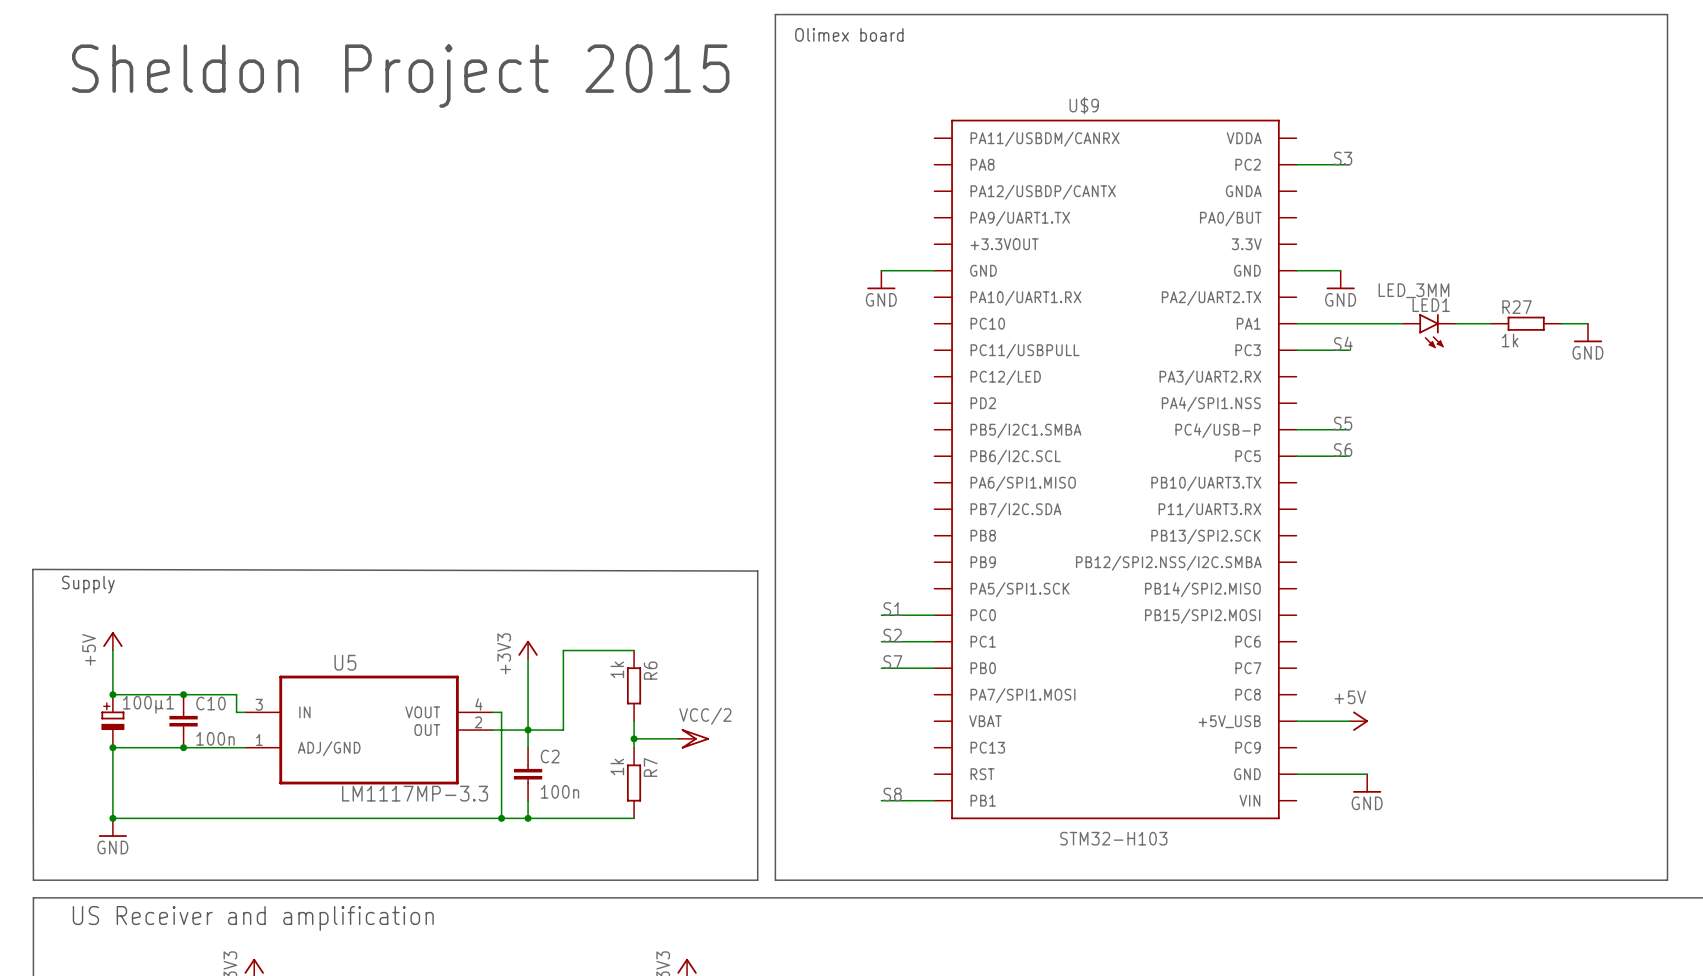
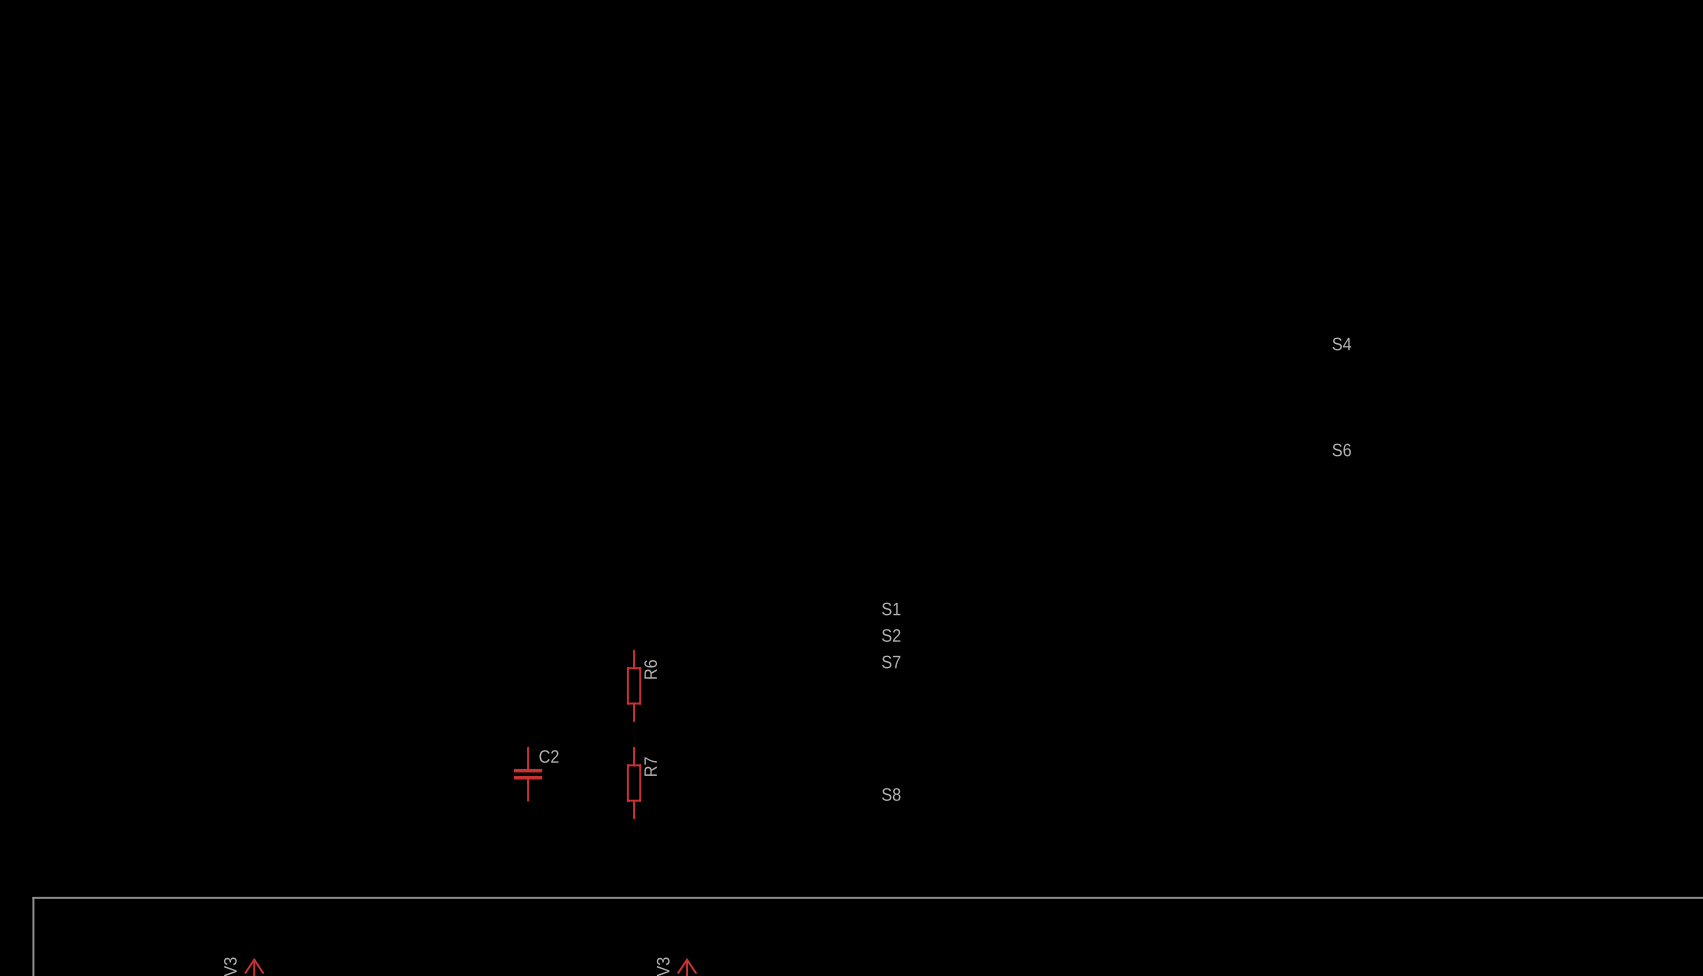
line: (775, 14) (1667, 14) (1667, 880) (775, 880) (775, 14) -> none
text: Olimex board (849, 34) -> none
text: Sheldon Project 2015 (400, 76) -> none
label: S3 (1343, 158) -> none
wire: (1296, 164) (1349, 164) -> none
wire: (881, 270) (934, 270) -> none
wire: (1296, 270) (1340, 270) -> none
power symbol: GND (881, 280) -> none
power symbol: GND (1340, 280) -> none
wire: (1296, 323) (1402, 323) -> none
wire: (1455, 323) (1490, 323) -> none
R27: 1k (1526, 323) -> none
wire: (1561, 323) (1588, 323) -> none
LED1: LED_3MM (1429, 331) -> none
power symbol: GND (1588, 332) -> none
wire: (1296, 350) (1349, 350) -> none
label: S5 (1343, 423) -> none
wire: (1296, 429) (1349, 429) -> none
wire: (1296, 456) (1349, 456) -> none
U$9: STM32-H103 (1115, 469) -> none
line: (32, 569) (757, 571) (757, 880) (33, 880) (32, 569) -> none
text: Supply (88, 584) -> none
wire: (881, 615) (934, 615) -> none
power symbol: +5V (112, 641) -> none
wire: (881, 641) (934, 641) -> none
wire: (112, 650) (112, 694) (236, 694) (236, 712) (245, 712) -> none
power symbol: +3V3 (528, 650) -> none
wire: (634, 650) (563, 650) (563, 730) (492, 730) -> none
wire: (528, 659) (528, 747) -> none
wire: (881, 668) (934, 668) -> none
R6 value: 1k (617, 669) -> none
junction: (112, 694) -> none
junction: (183, 694) -> none
wire: (492, 712) (501, 712) (501, 818) -> none
100µ1: (112, 721) -> none
C10: 100n (183, 721) -> none
wire: (634, 721) (634, 747) -> none
wire: (1296, 721) (1349, 721) -> none
power symbol: +5V (1358, 721) -> none
U5: LM1117MP-3.3 (369, 730) -> none
junction: (528, 730) -> none
wire: (634, 738) (678, 738) -> none
junction: (634, 738) -> none
power symbol: VCC/2 (693, 738) -> none
junction: (112, 747) -> none
junction: (183, 747) -> none
wire: (245, 747) (112, 747) (112, 818) (634, 818) -> none
R7 value: 1k (617, 766) -> none
wire: (1296, 774) (1367, 774) -> none
power symbol: GND (1367, 783) -> none
C2 value: 100n (559, 791) -> none
wire: (528, 800) (528, 818) -> none
wire: (881, 800) (934, 800) -> none
junction: (112, 818) -> none
junction: (501, 818) -> none
junction: (528, 818) -> none
power symbol: GND (112, 827) -> none
text: US Receiver and amplification (253, 918) -> none

